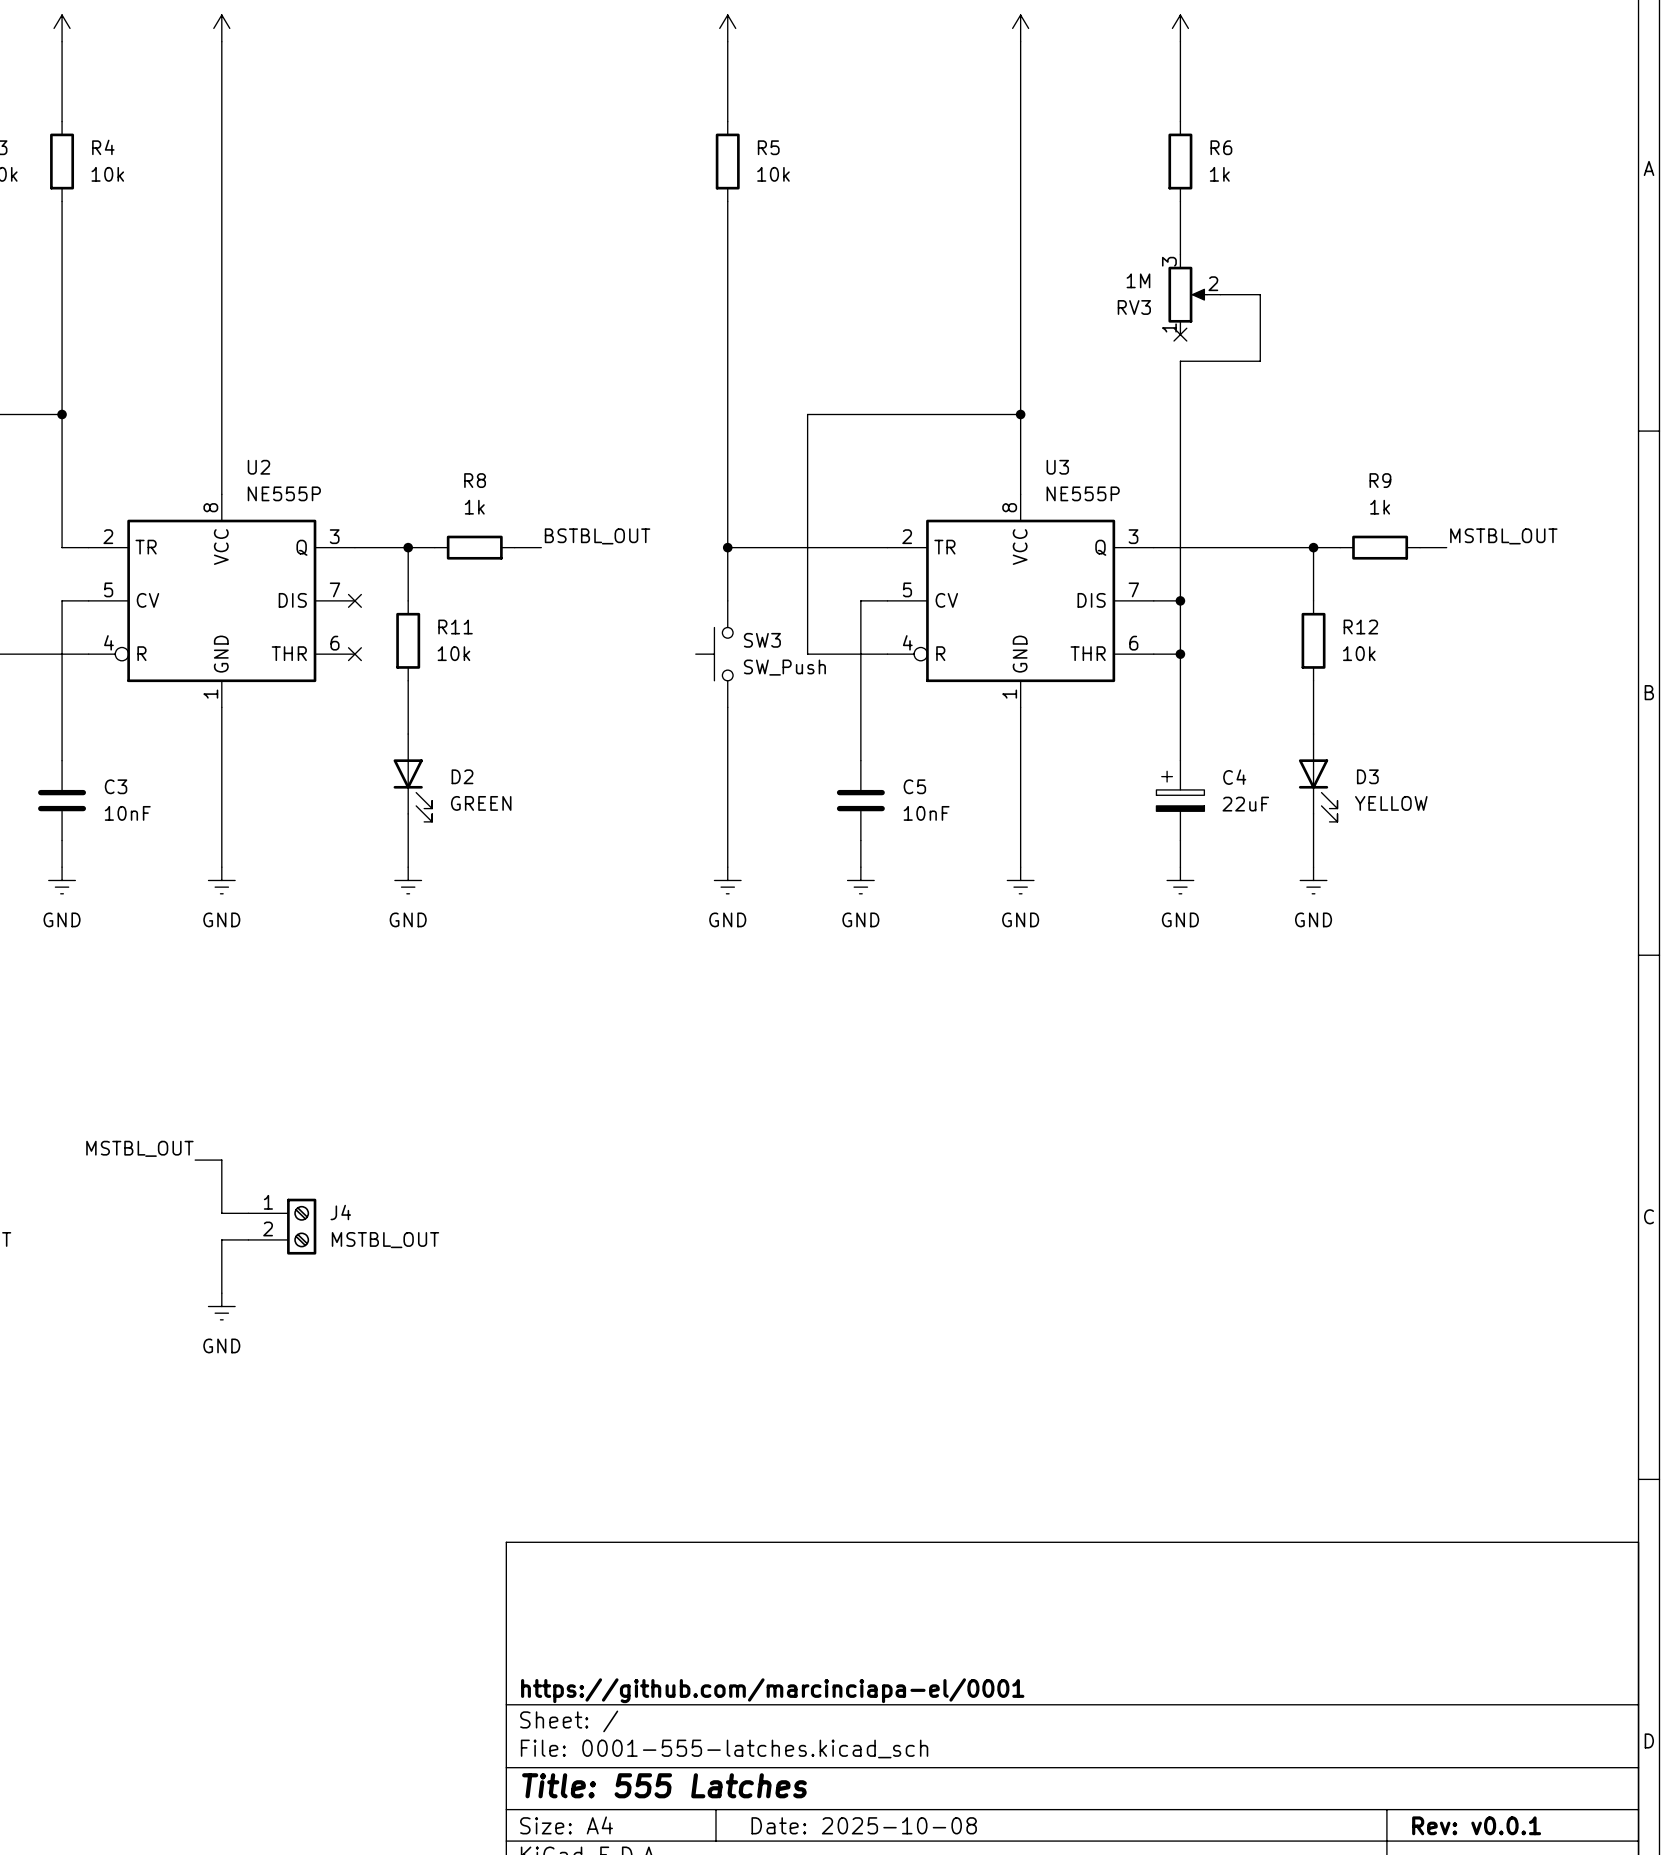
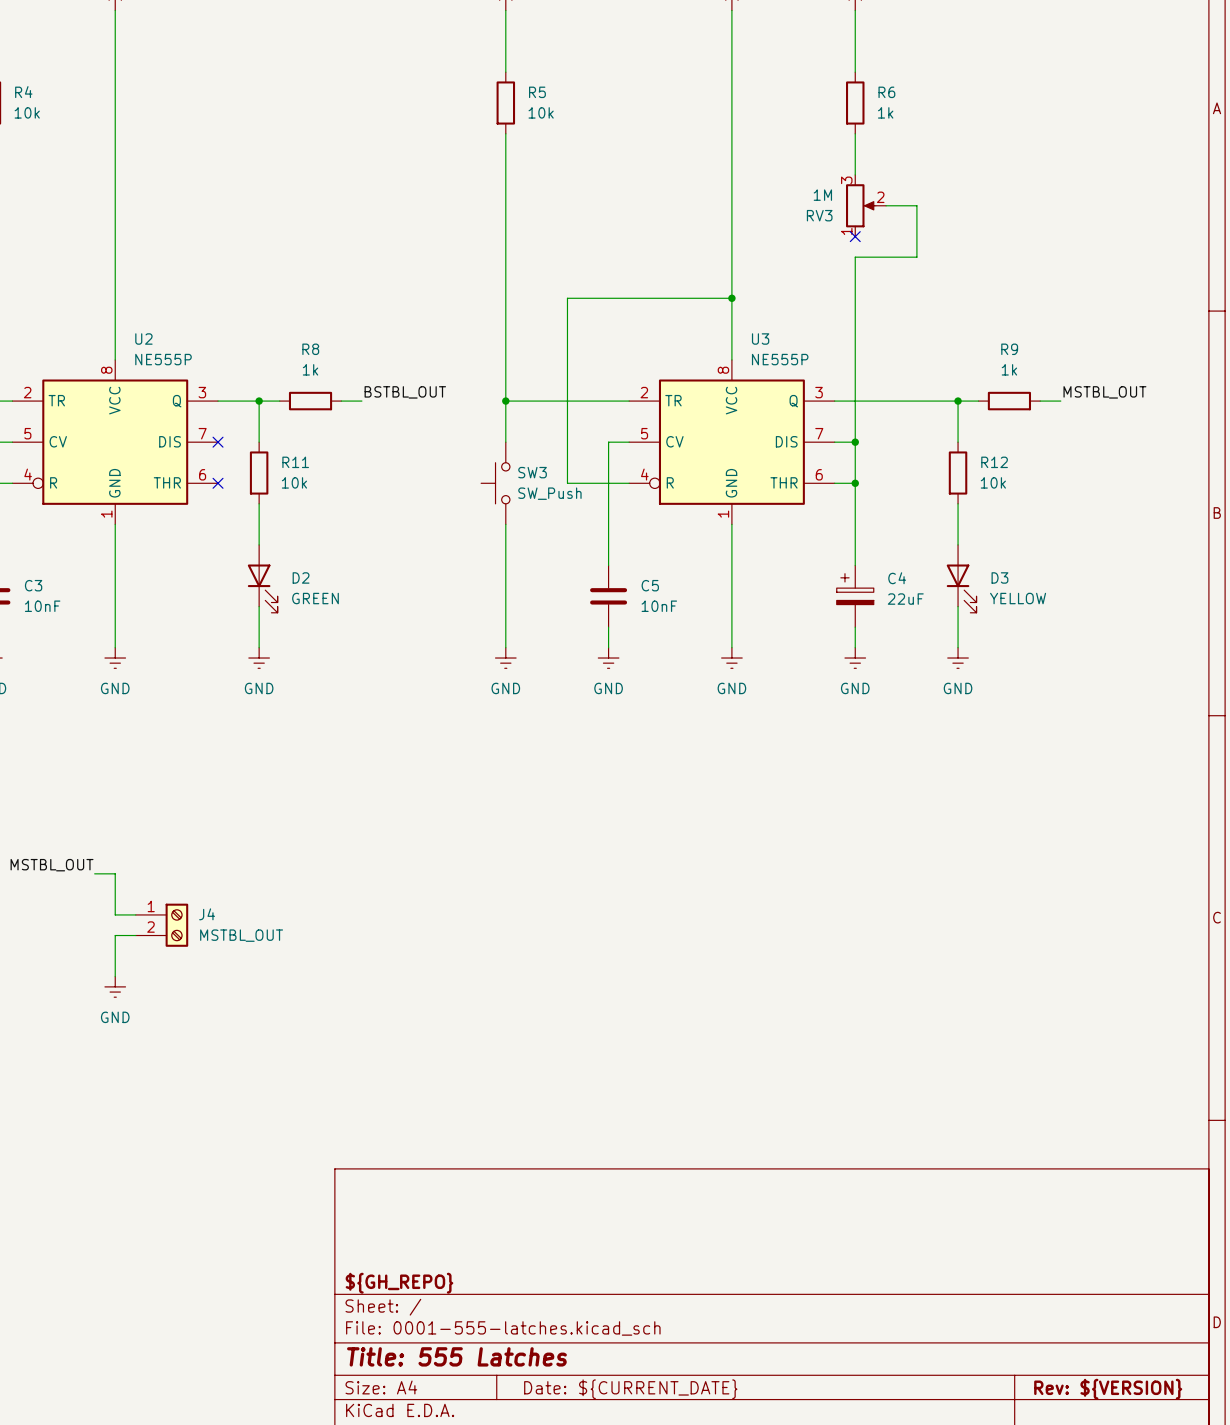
title block: https://github.com/marcinciapa-el/0001 (772, 1690) -> ${GH_REPO} (399, 1283)
title block: Date: 2025-10-08 (864, 1825) -> Date: ${CURRENT_DATE} (630, 1389)
title block: Rev: v0.0.1 (1476, 1825) -> Rev: ${VERSION} (1108, 1389)

